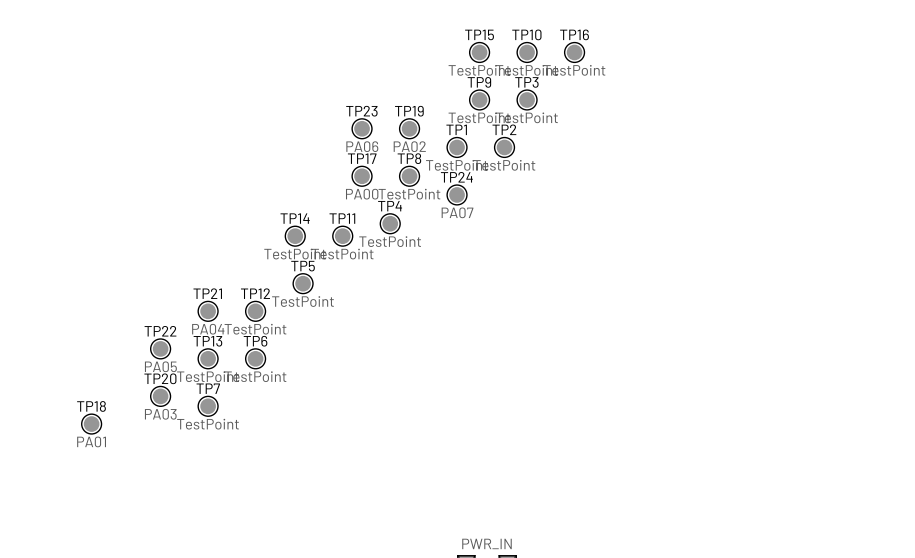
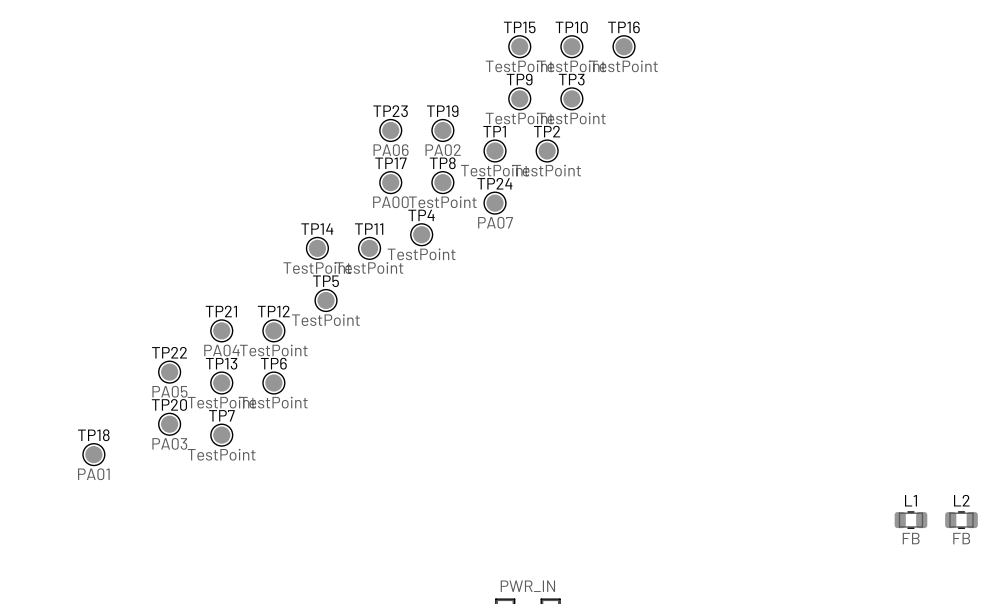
L1: none -> FB (910, 520)
L2: none -> FB (961, 520)

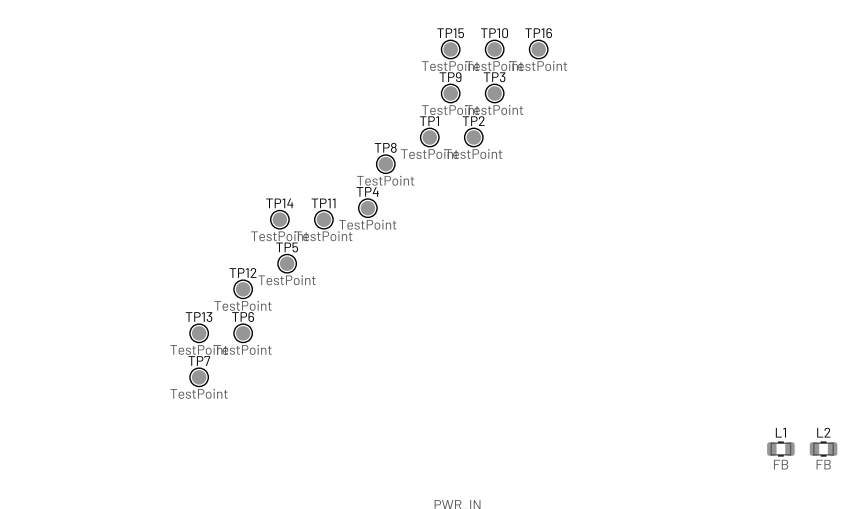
TP23: PA06 (390, 130) -> none
TP19: PA02 (442, 130) -> none
TP17: PA00 (390, 182) -> none
TP24: PA07 (495, 203) -> none
TP21: PA04 (221, 330) -> none
TP22: PA05 (169, 372) -> none
TP20: PA03 (169, 424) -> none
TP18: PA01 (93, 454) -> none

